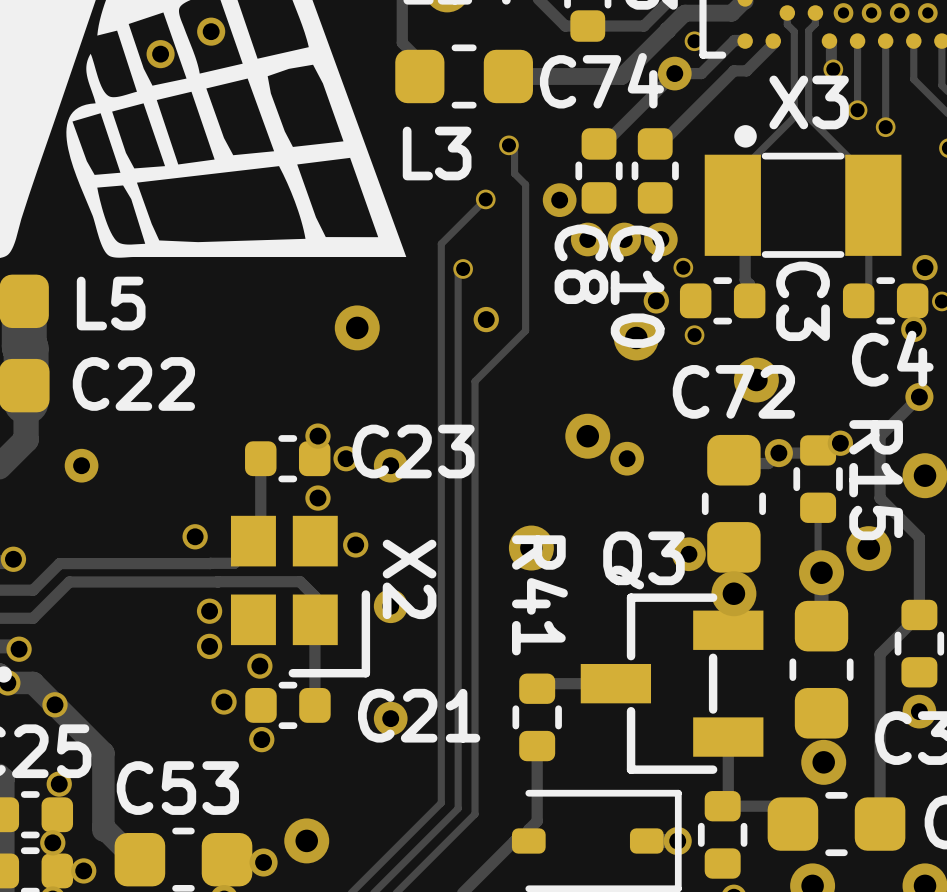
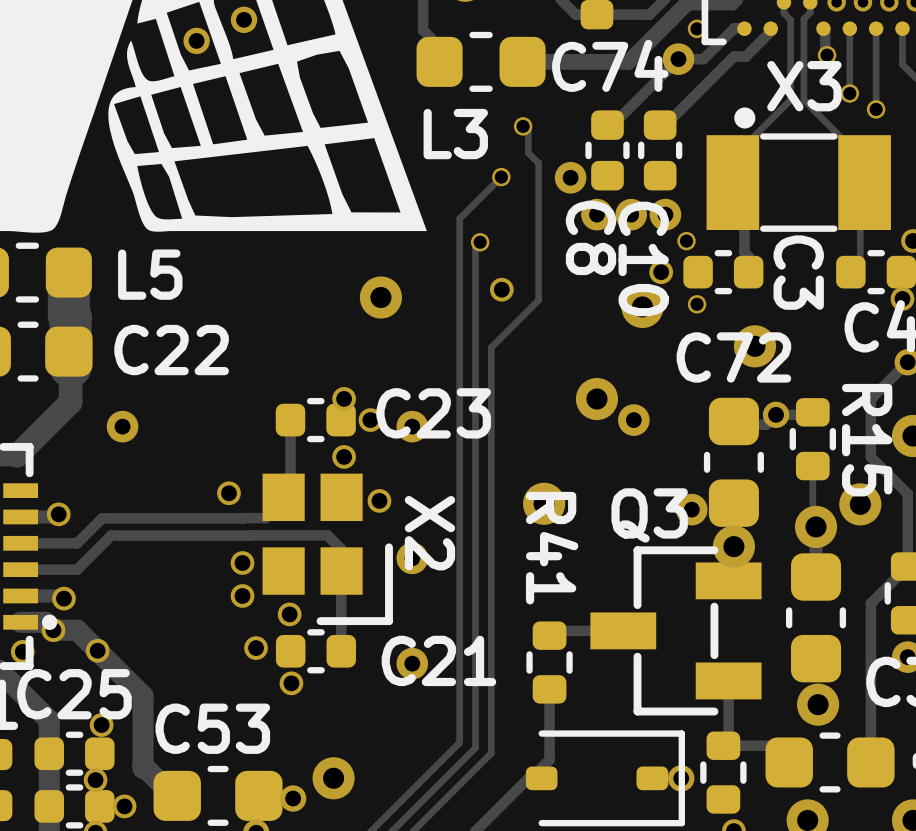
via: (840, 443) -> none

